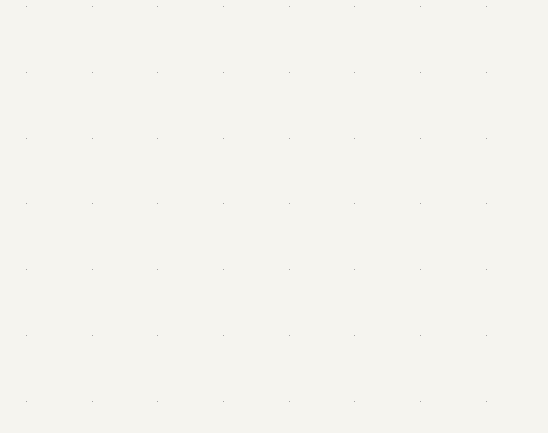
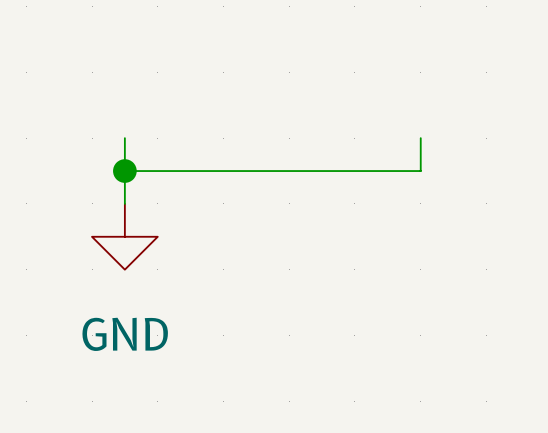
wire: none -> (124, 138) (124, 203)
wire: none -> (420, 138) (420, 171) (124, 171)
junction: none -> (124, 171)
power symbol: none -> GND (124, 236)

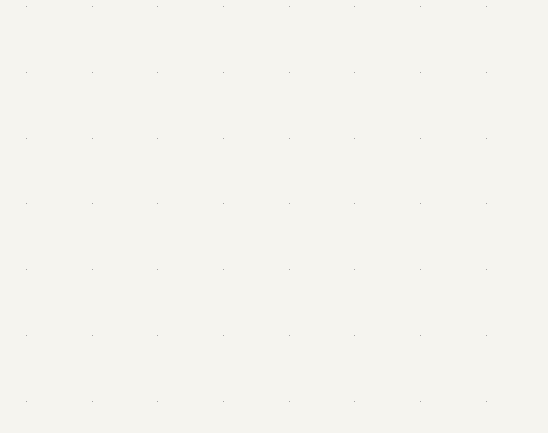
wire: (124, 138) (124, 203) -> none
wire: (420, 138) (420, 171) (124, 171) -> none
junction: (124, 171) -> none
power symbol: GND (124, 236) -> none

